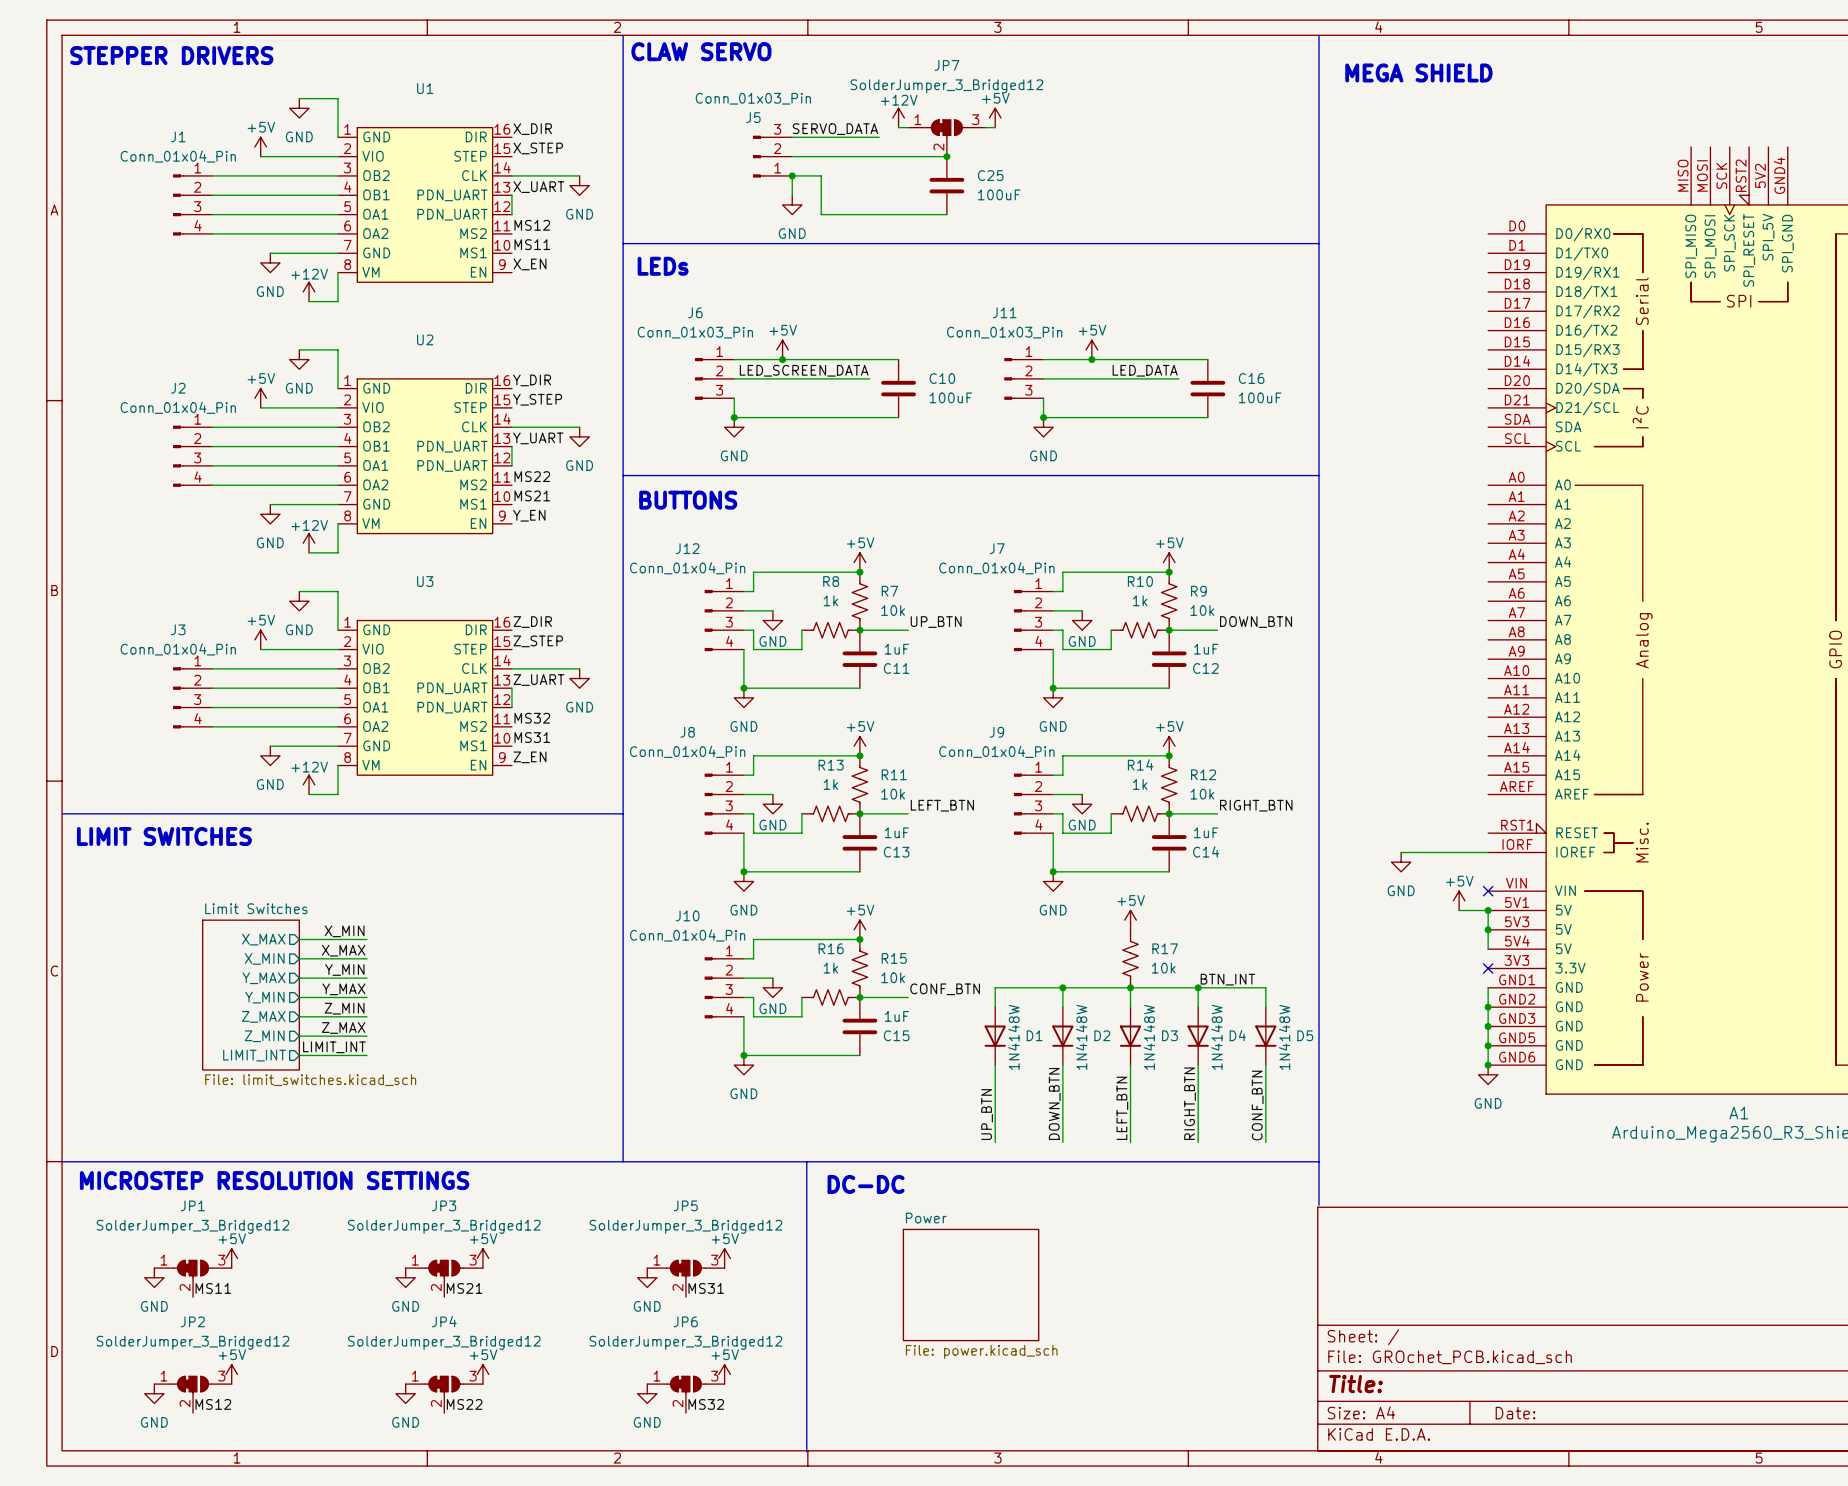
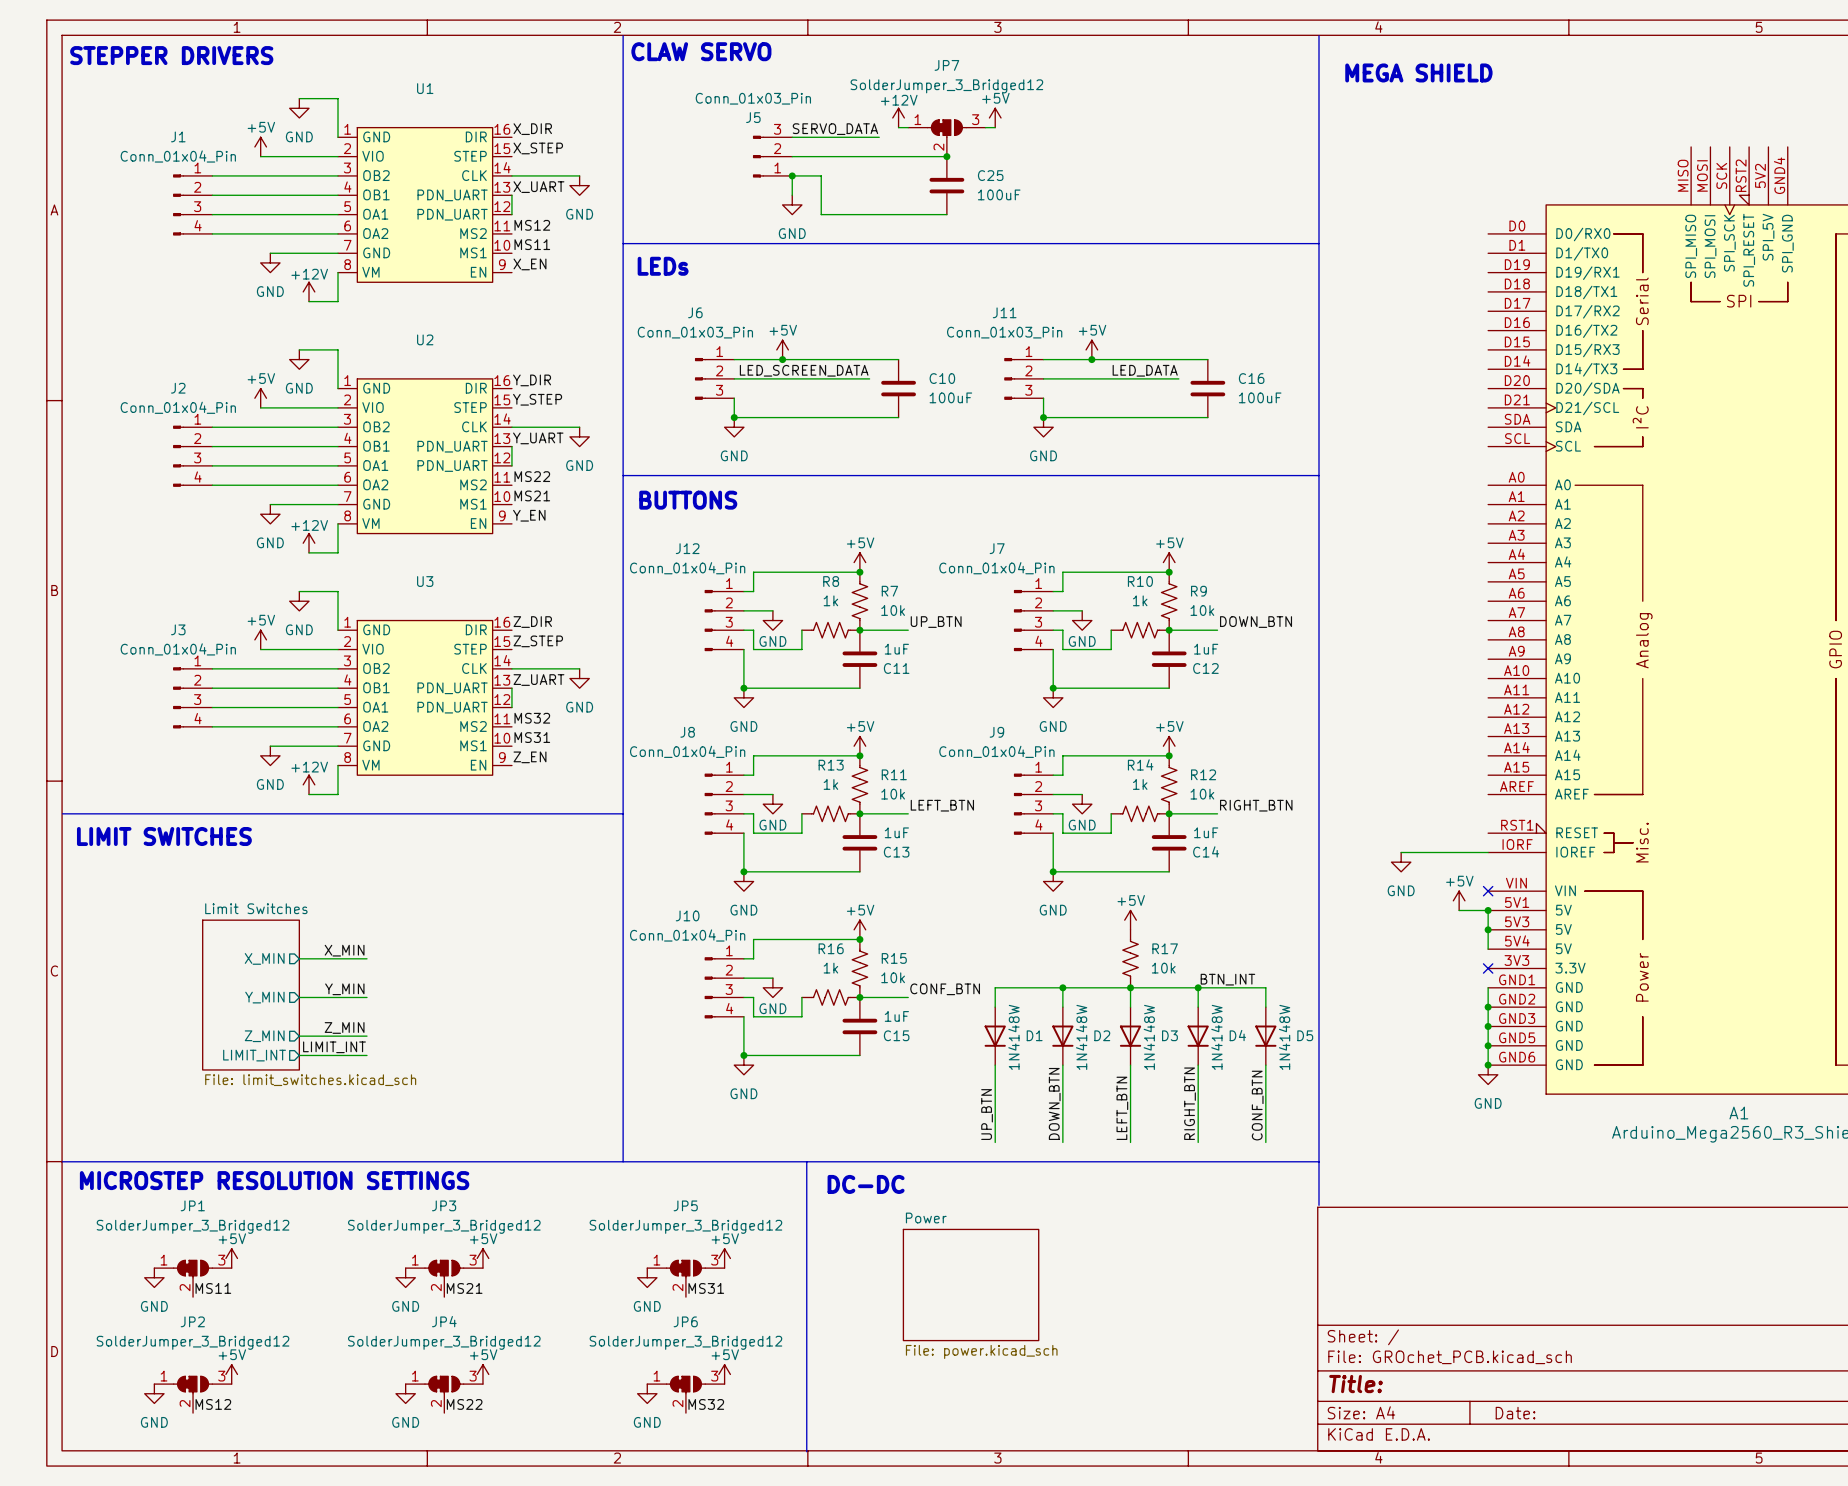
label: X_MIN (344, 931) -> none
sheet pin: X_MAX (263, 939) -> none
wire: (299, 939) (366, 939) -> none
label: X_MAX (343, 950) -> X_MIN (344, 950)
label: Y_MIN (344, 969) -> none
sheet pin: Y_MAX (263, 978) -> none
wire: (299, 978) (366, 978) -> none
label: Y_MAX (343, 989) -> Y_MIN (344, 989)
label: Z_MIN (344, 1008) -> none
sheet pin: Z_MAX (263, 1016) -> none
wire: (299, 1016) (366, 1016) -> none
label: Z_MAX (343, 1027) -> Z_MIN (344, 1027)

